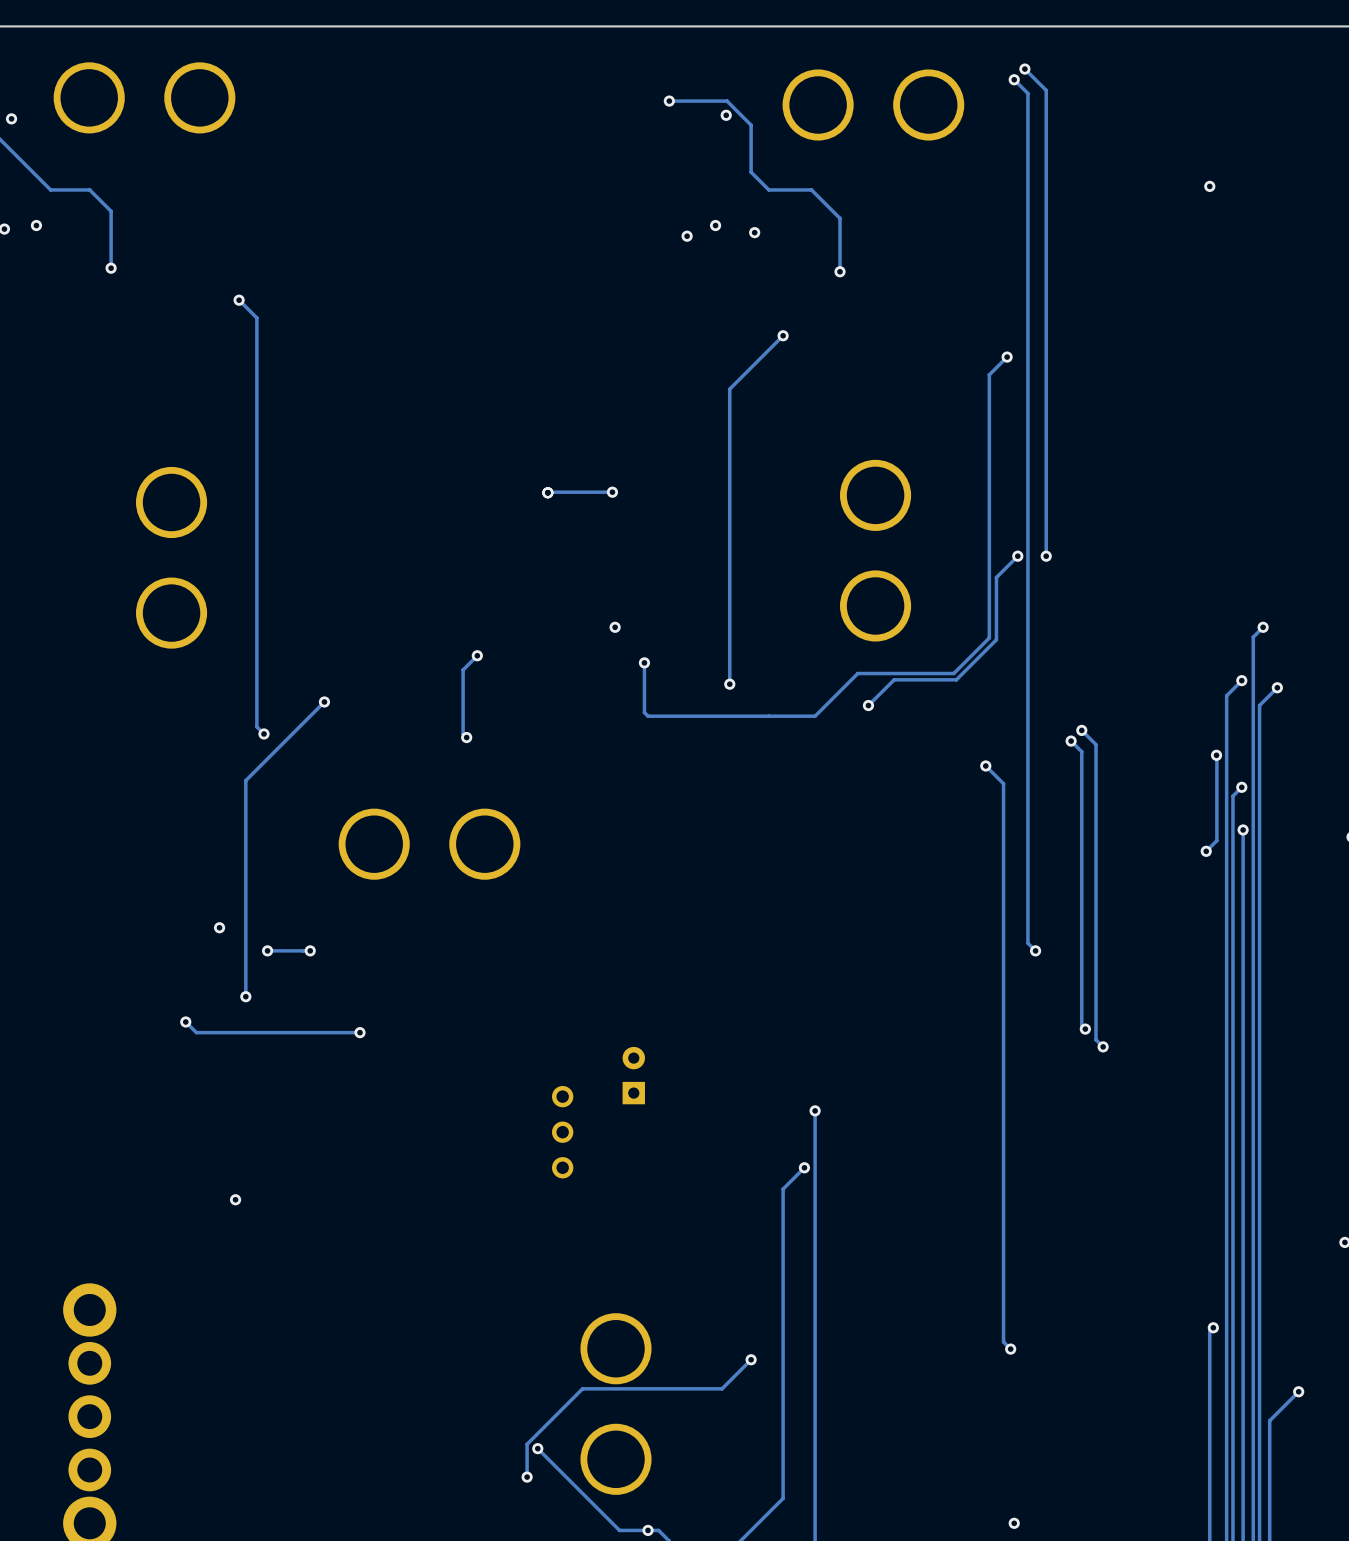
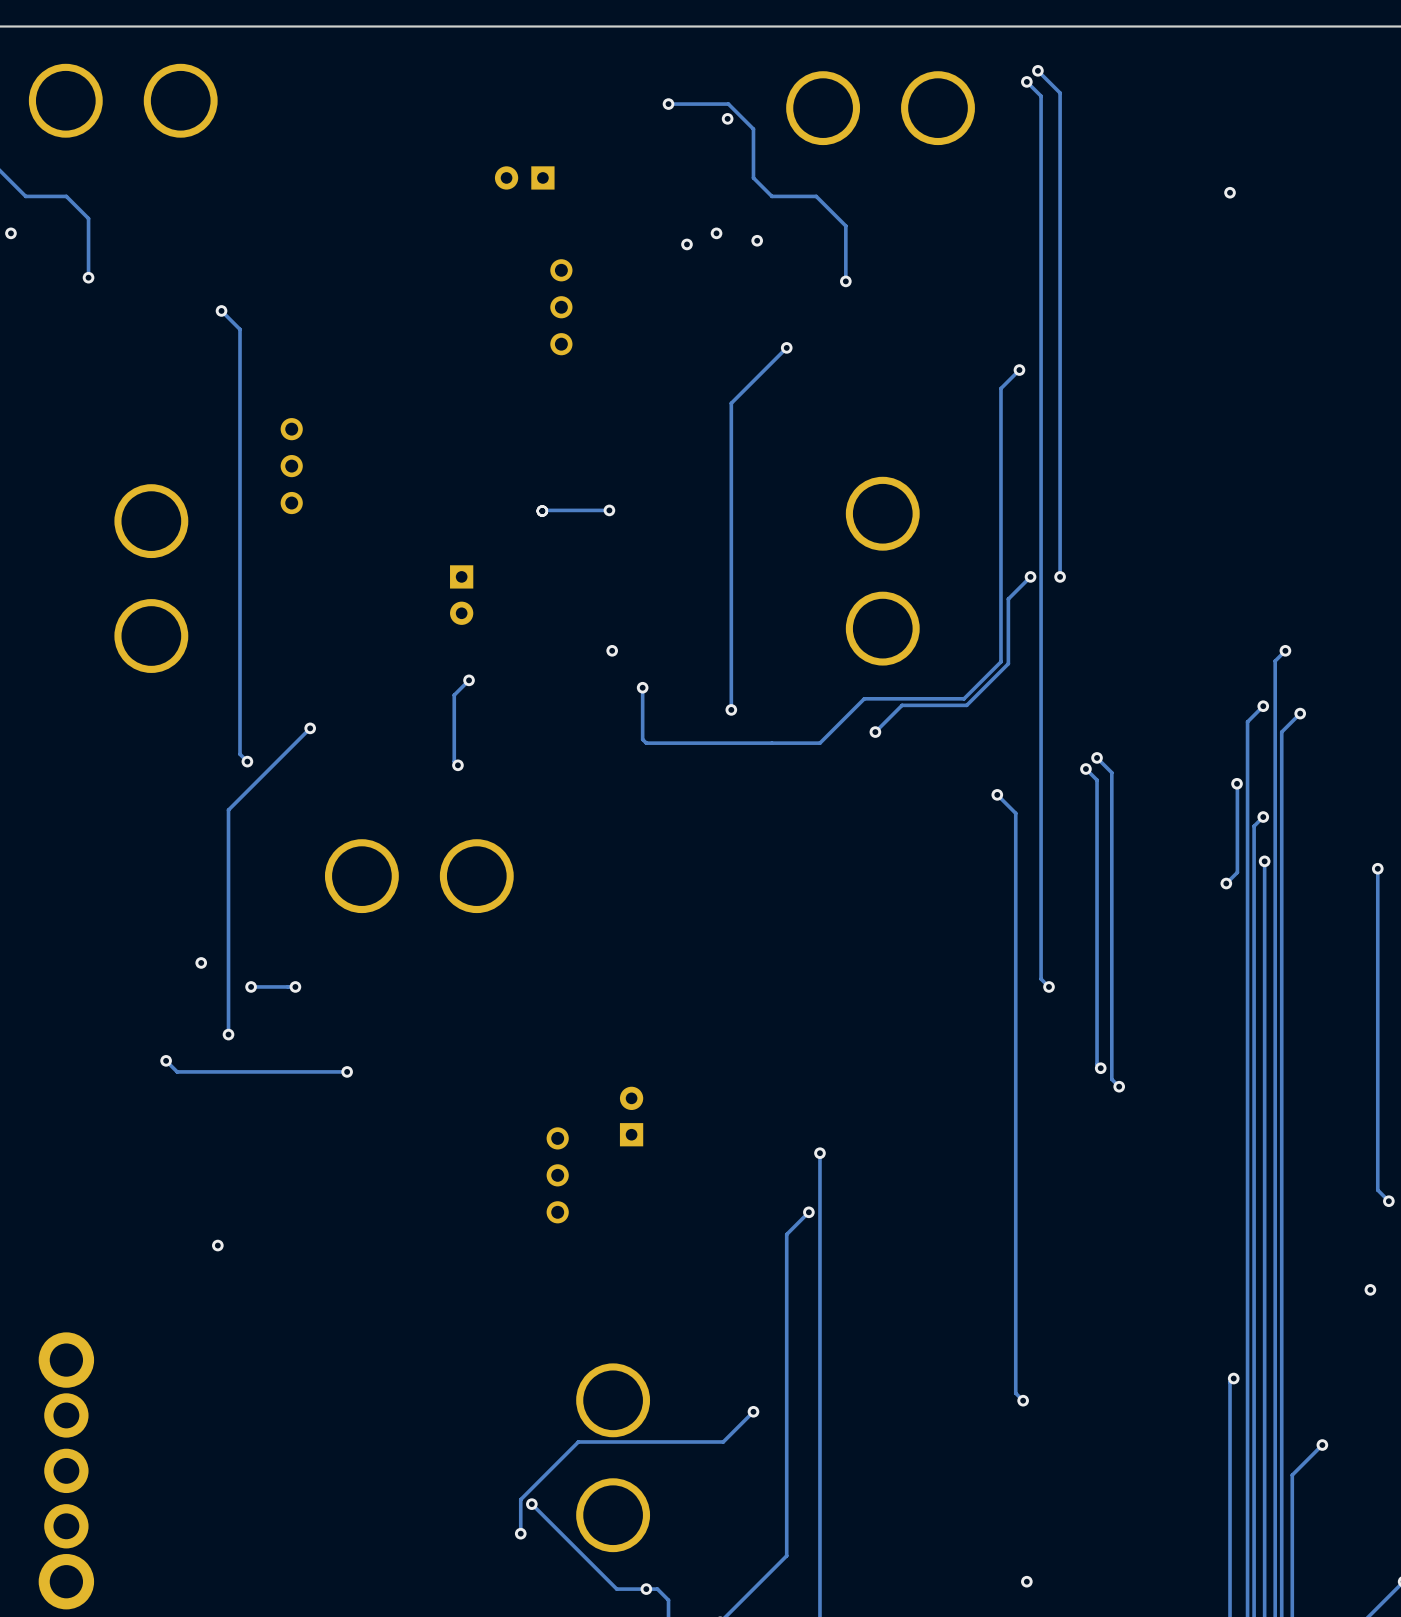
part: none -> (524, 177)
part: none -> (561, 307)
part: none -> (291, 466)
part: none -> (461, 595)

